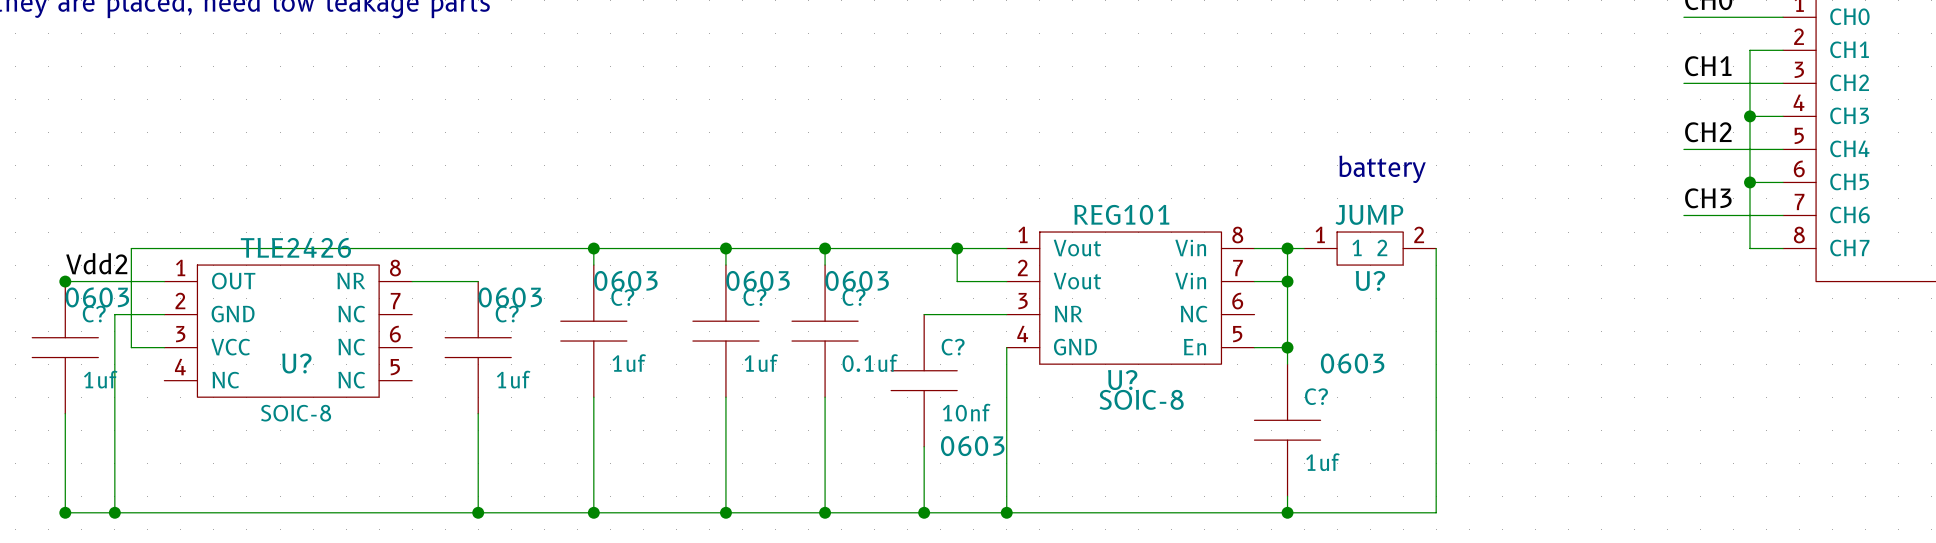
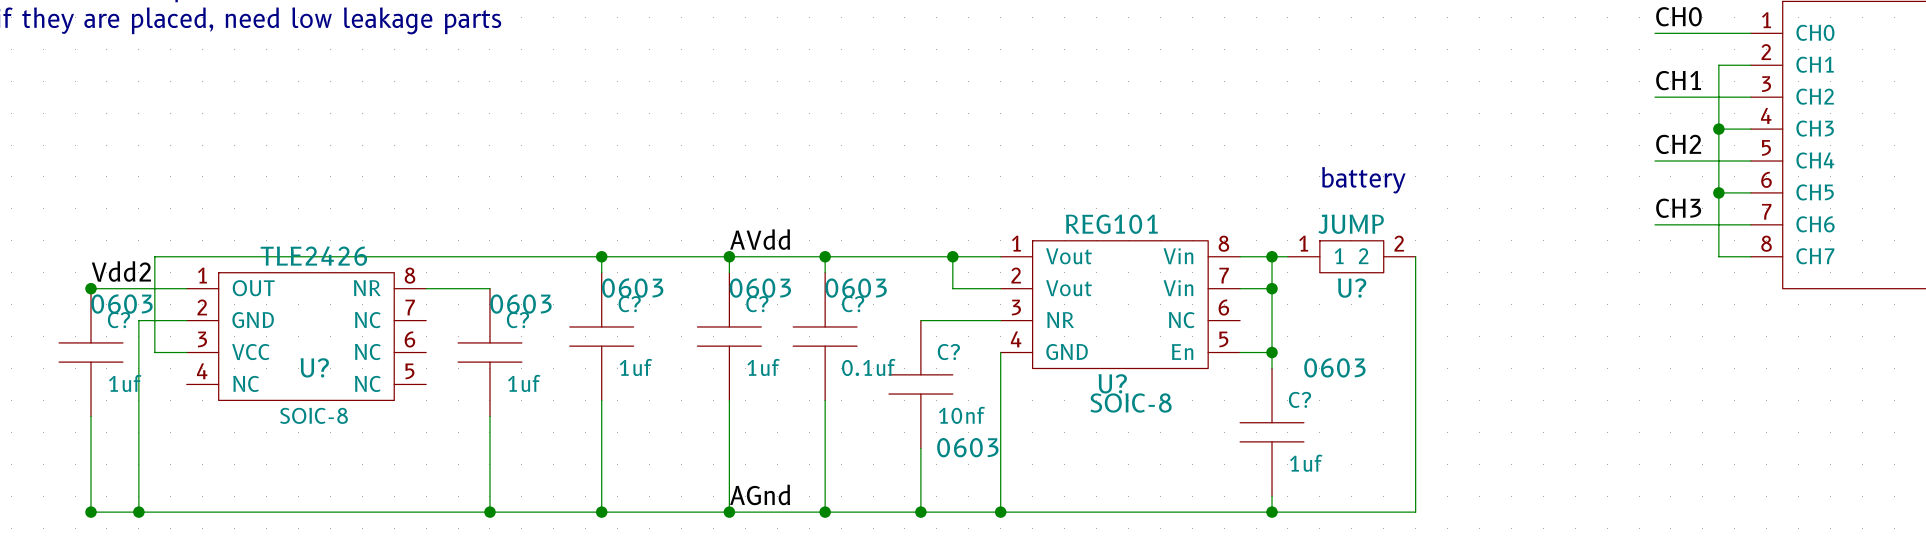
label: none -> AVdd (760, 239)
label: none -> AGnd (760, 494)

